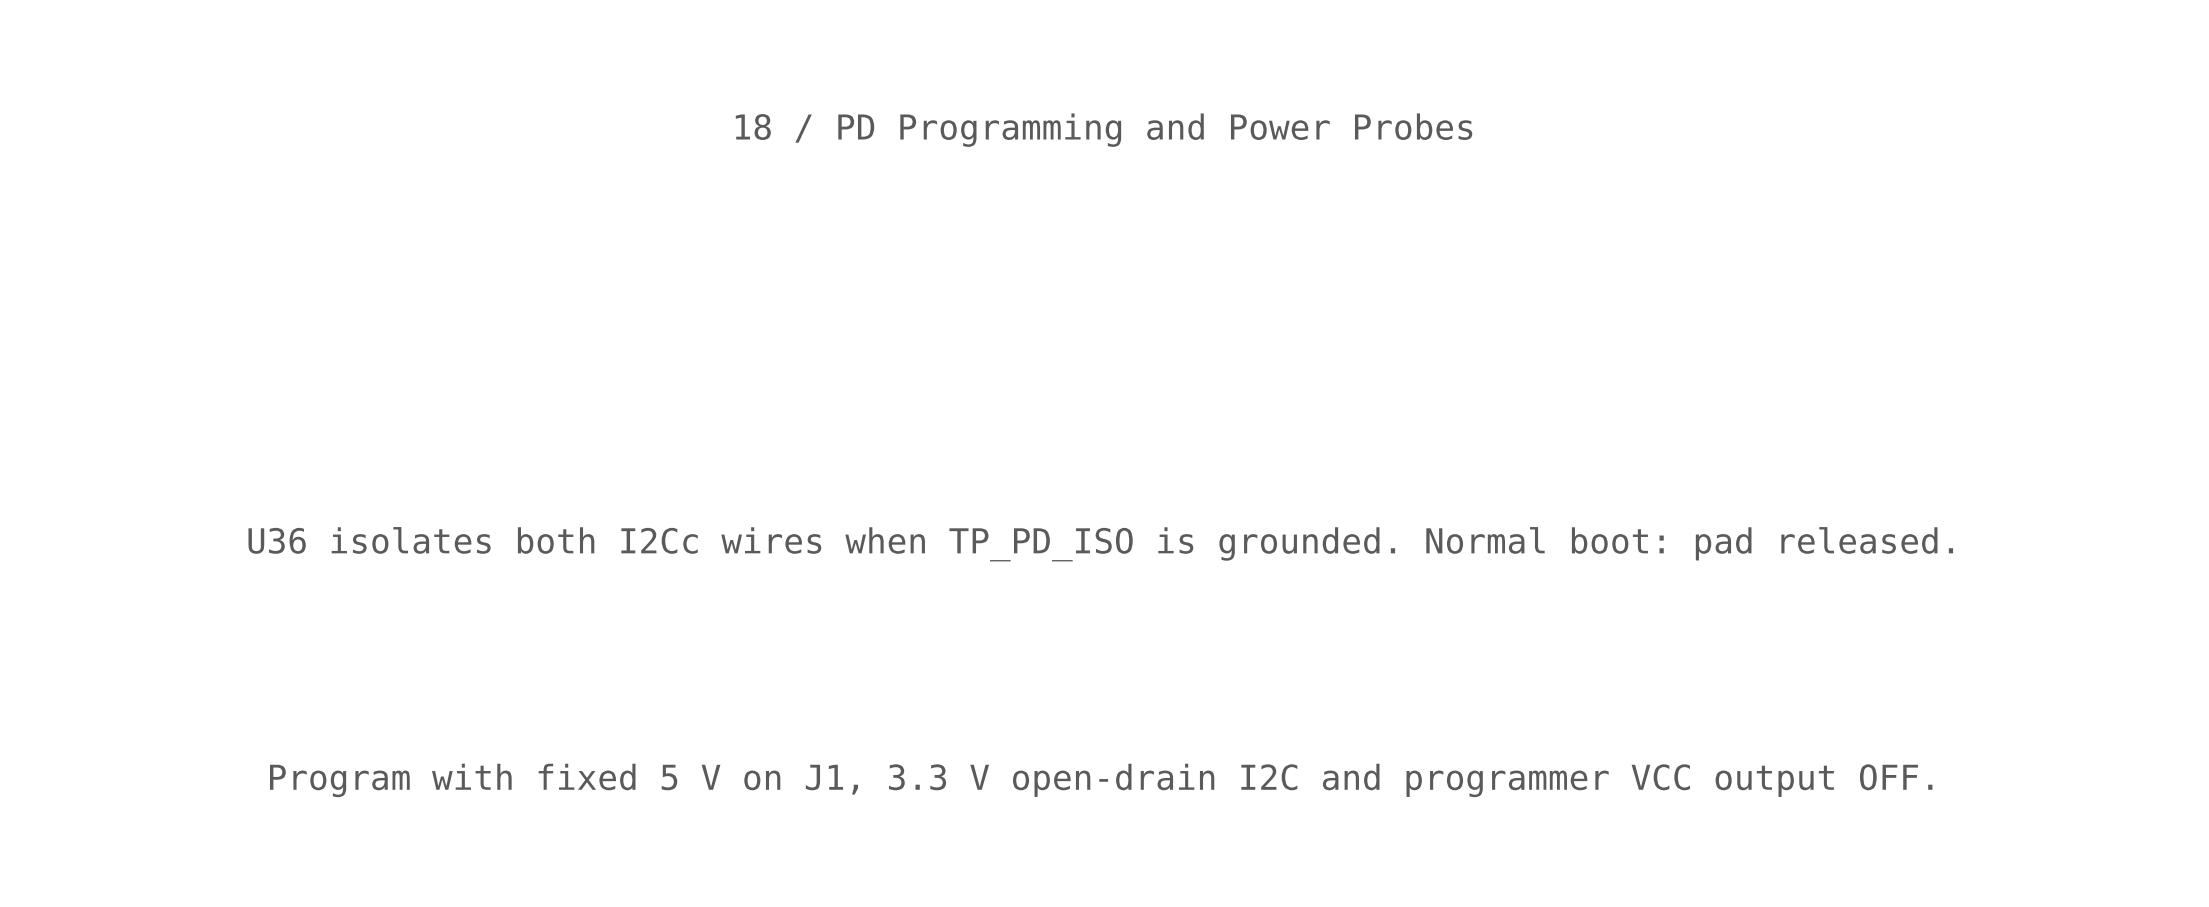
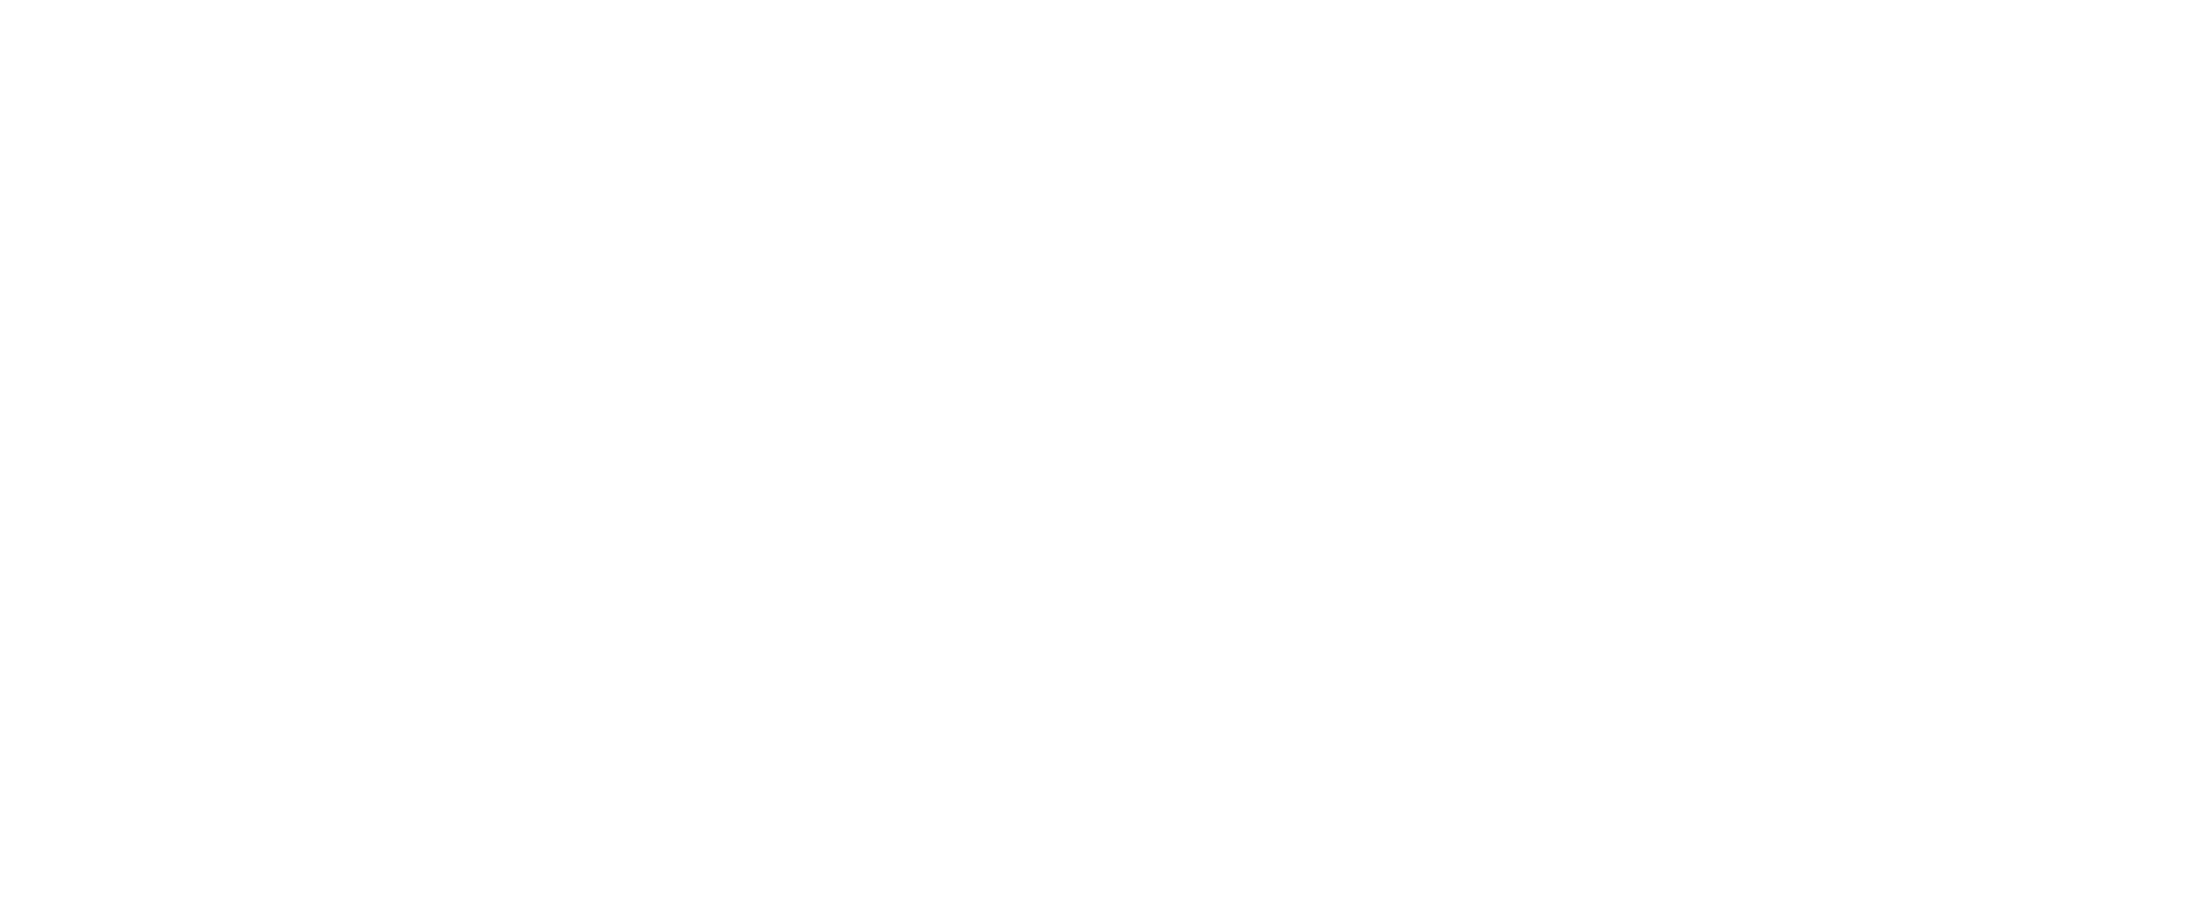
text: 18 / PD Programming and Power Probes (1104, 130) -> none
text: U36 isolates both I2Cc wires when TP_PD_ISO is grounded. Normal boot: pad released. (1100, 544) -> none
text: Program with fixed 5 V on J1, 3.3 V open-drain I2C and programmer VCC output OFF. (1101, 780) -> none

